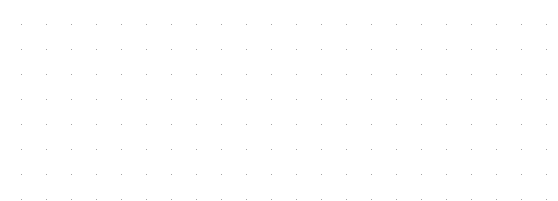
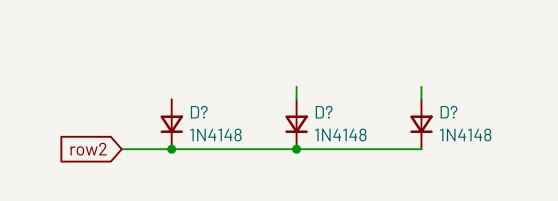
wire: none -> (296, 86) (296, 99)
wire: none -> (421, 86) (421, 99)
D?: none -> 1N4148 (171, 124)
D?: none -> 1N4148 (296, 124)
D?: none -> 1N4148 (421, 124)
global label: none -> row2 (88, 149)
wire: none -> (121, 149) (421, 149)
junction: none -> (171, 149)
junction: none -> (296, 149)

